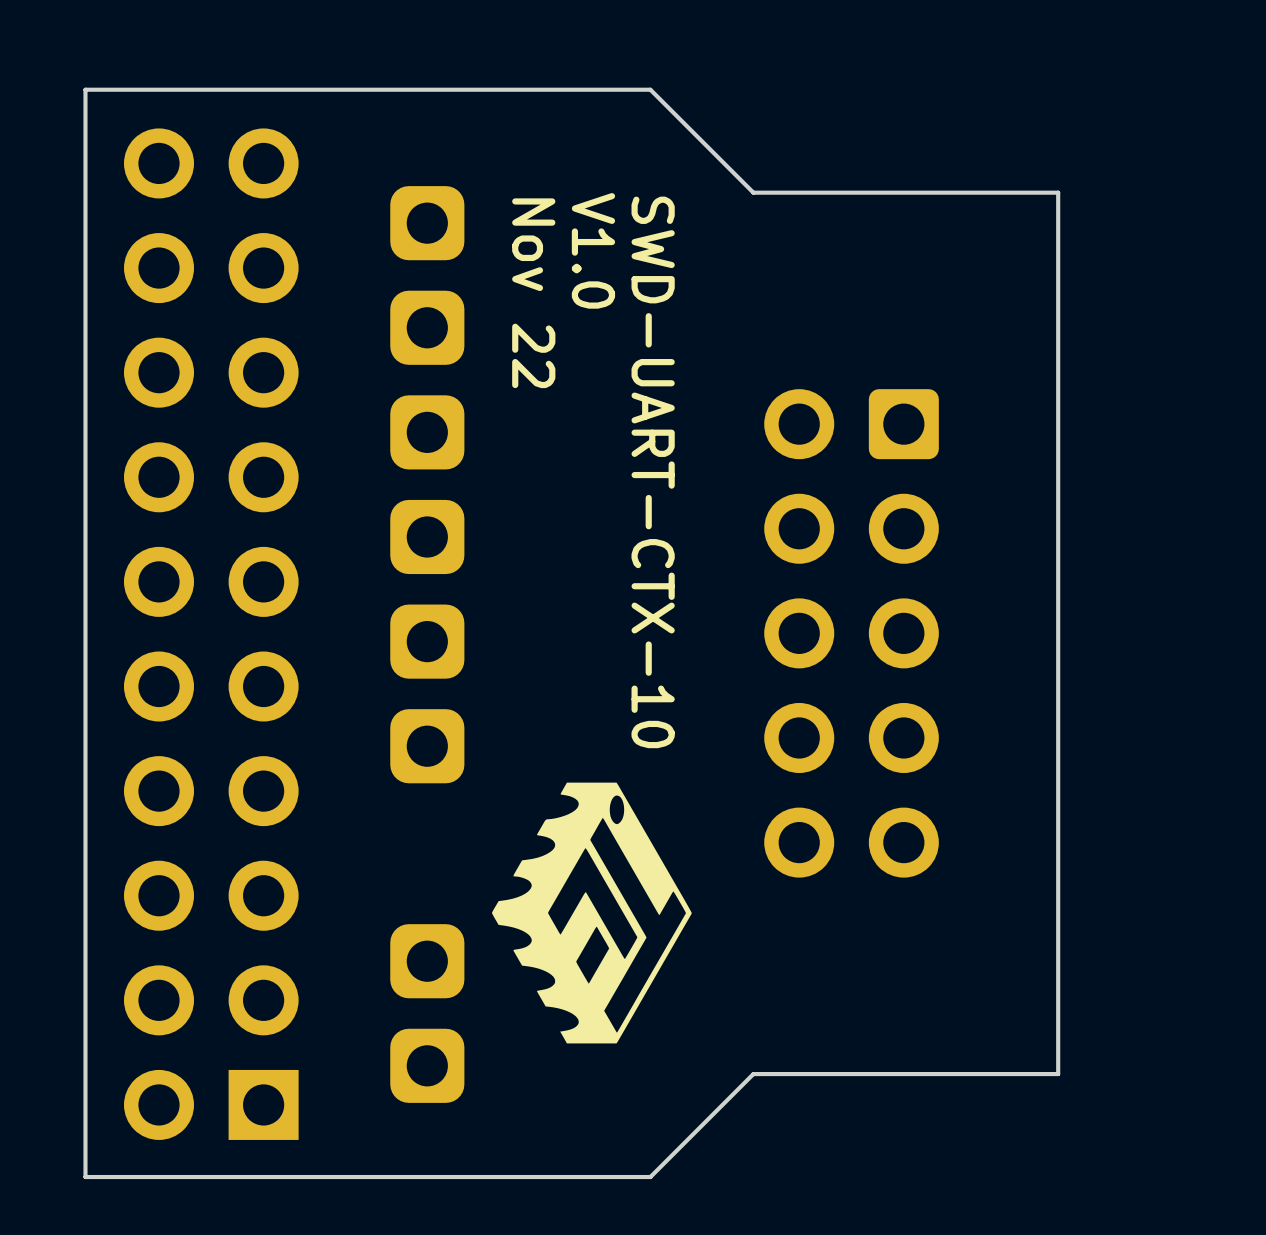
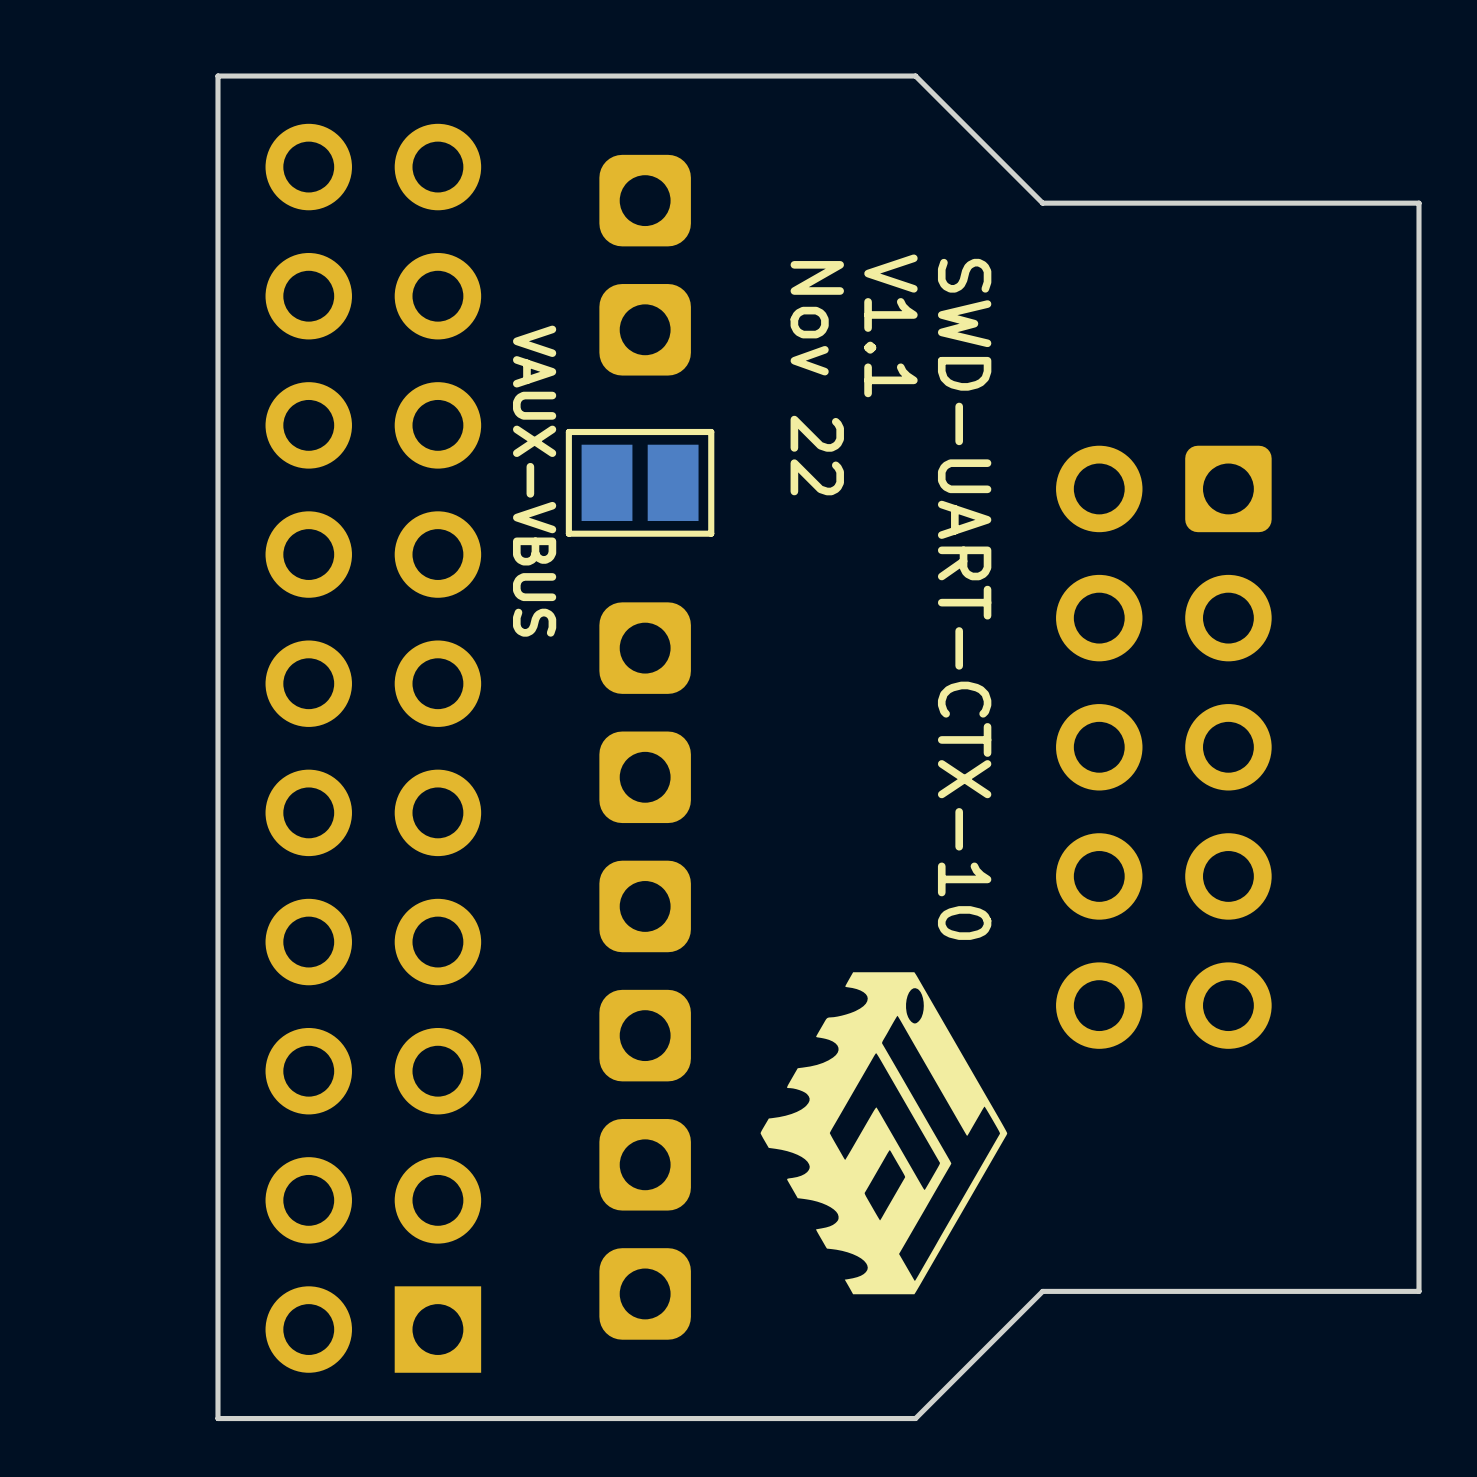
text: V1.0 (593, 250) -> V1.1 (890, 325)
text position: Nov 22 (533, 293) -> Nov 22 (817, 378)
text: none -> VAUX-VBUS (534, 481)
part: none -> (640, 482)
text position: SWD-UART-CTX-10 (653, 472) -> SWD-UART-CTX-10 (964, 599)
part position: (427, 484) -> (645, 971)
drawing position: (591, 913) -> (883, 1133)
part position: (427, 1013) -> (645, 265)

